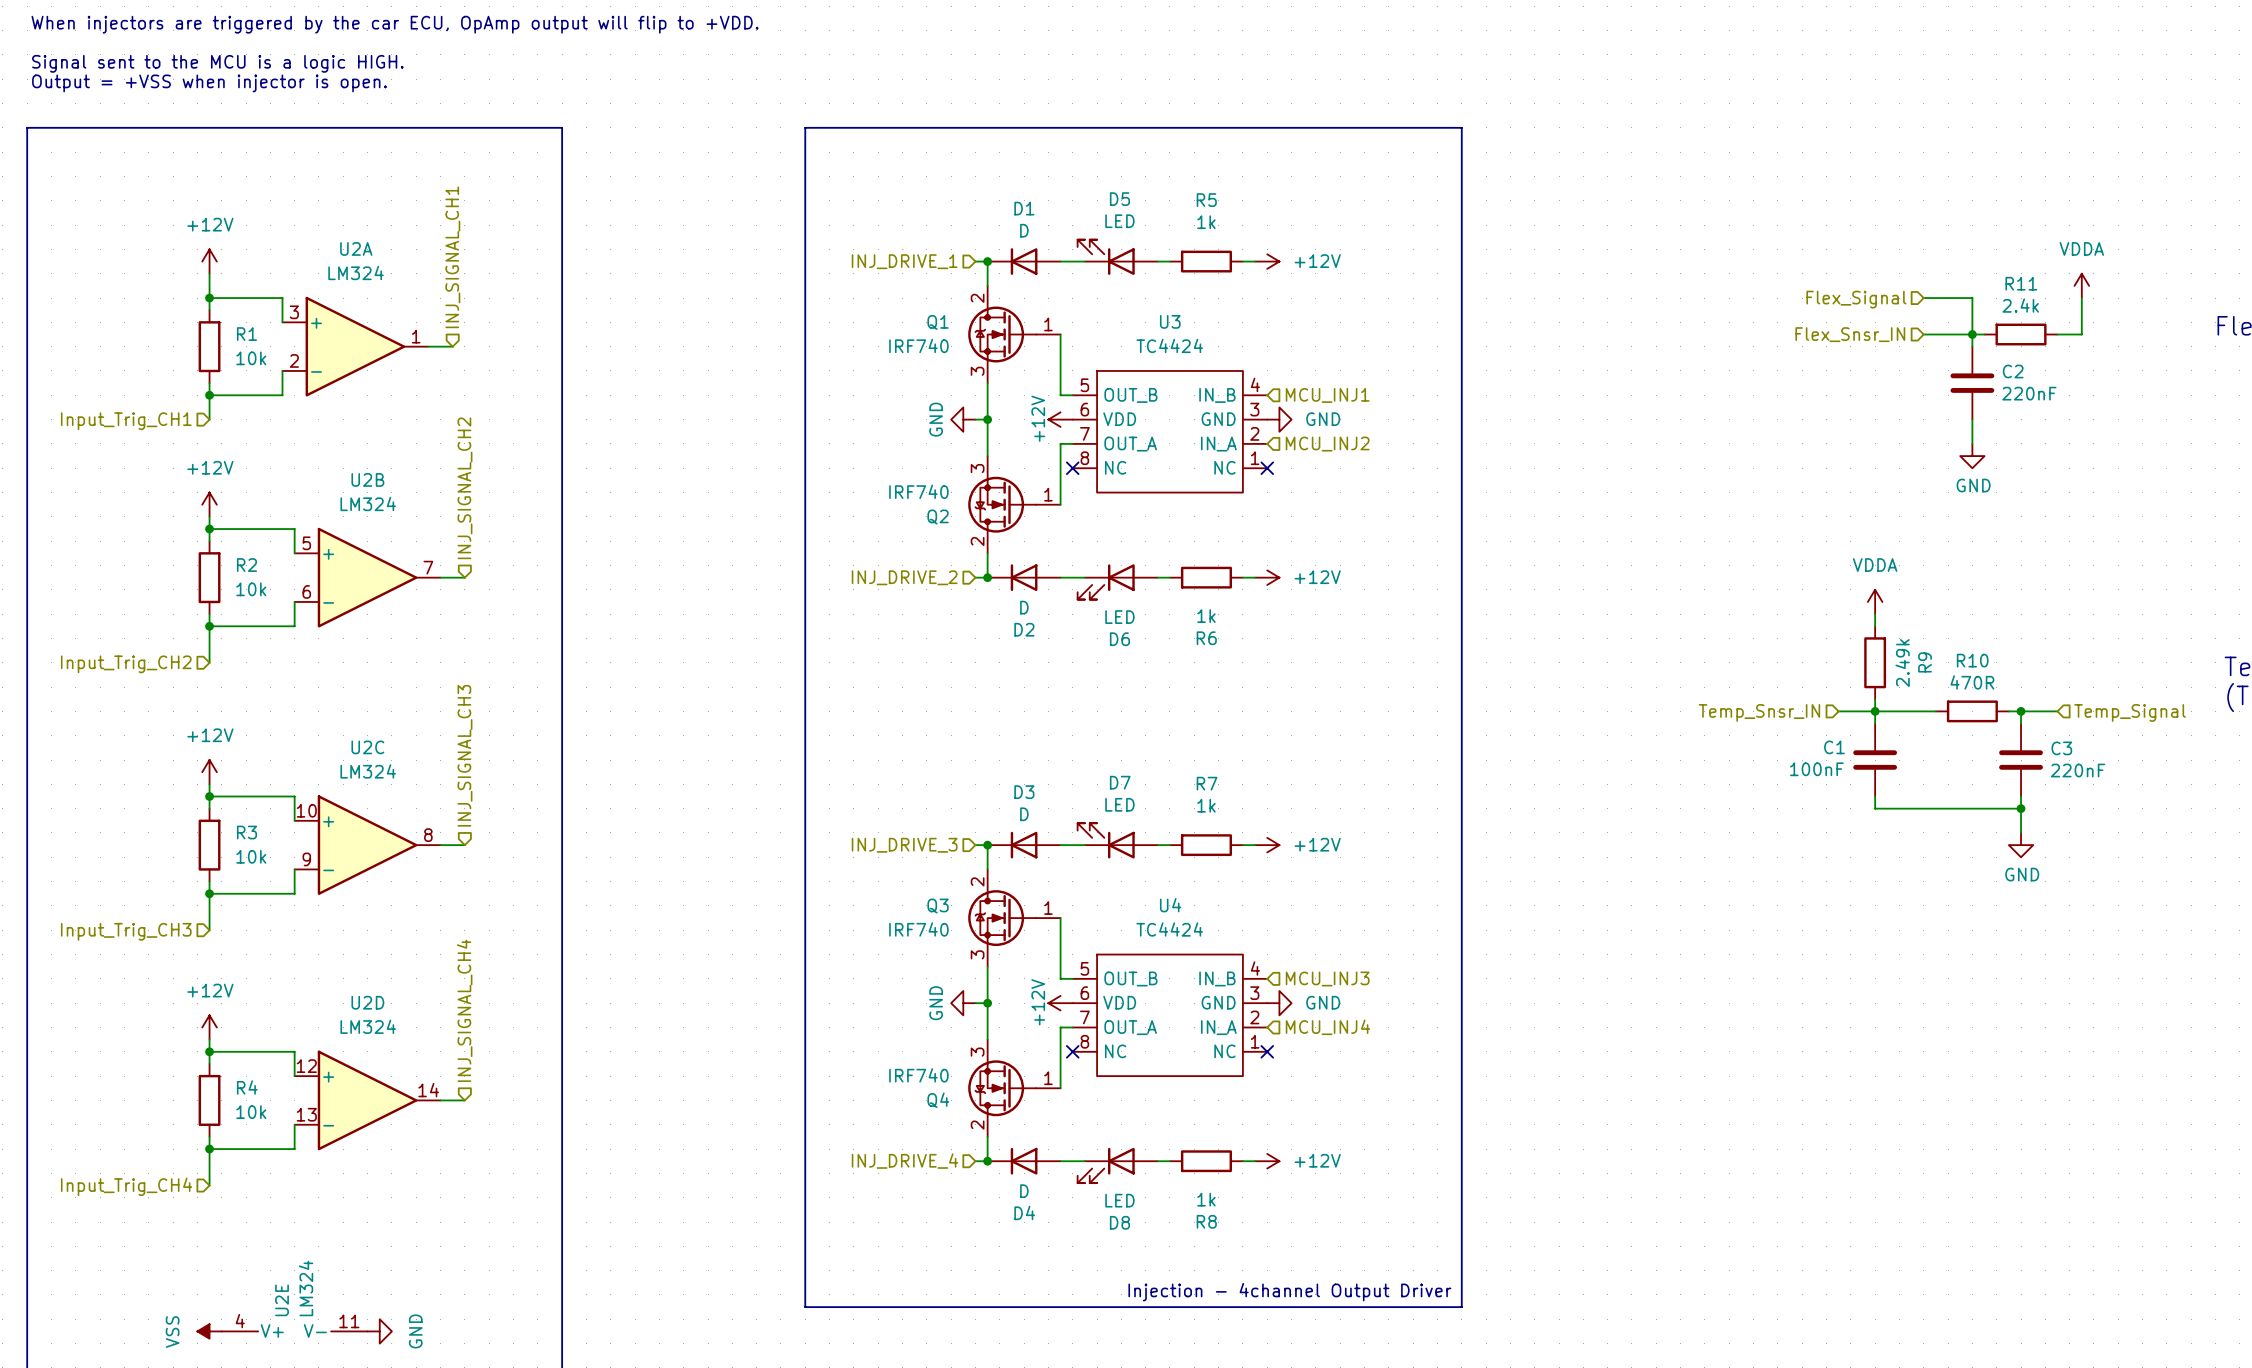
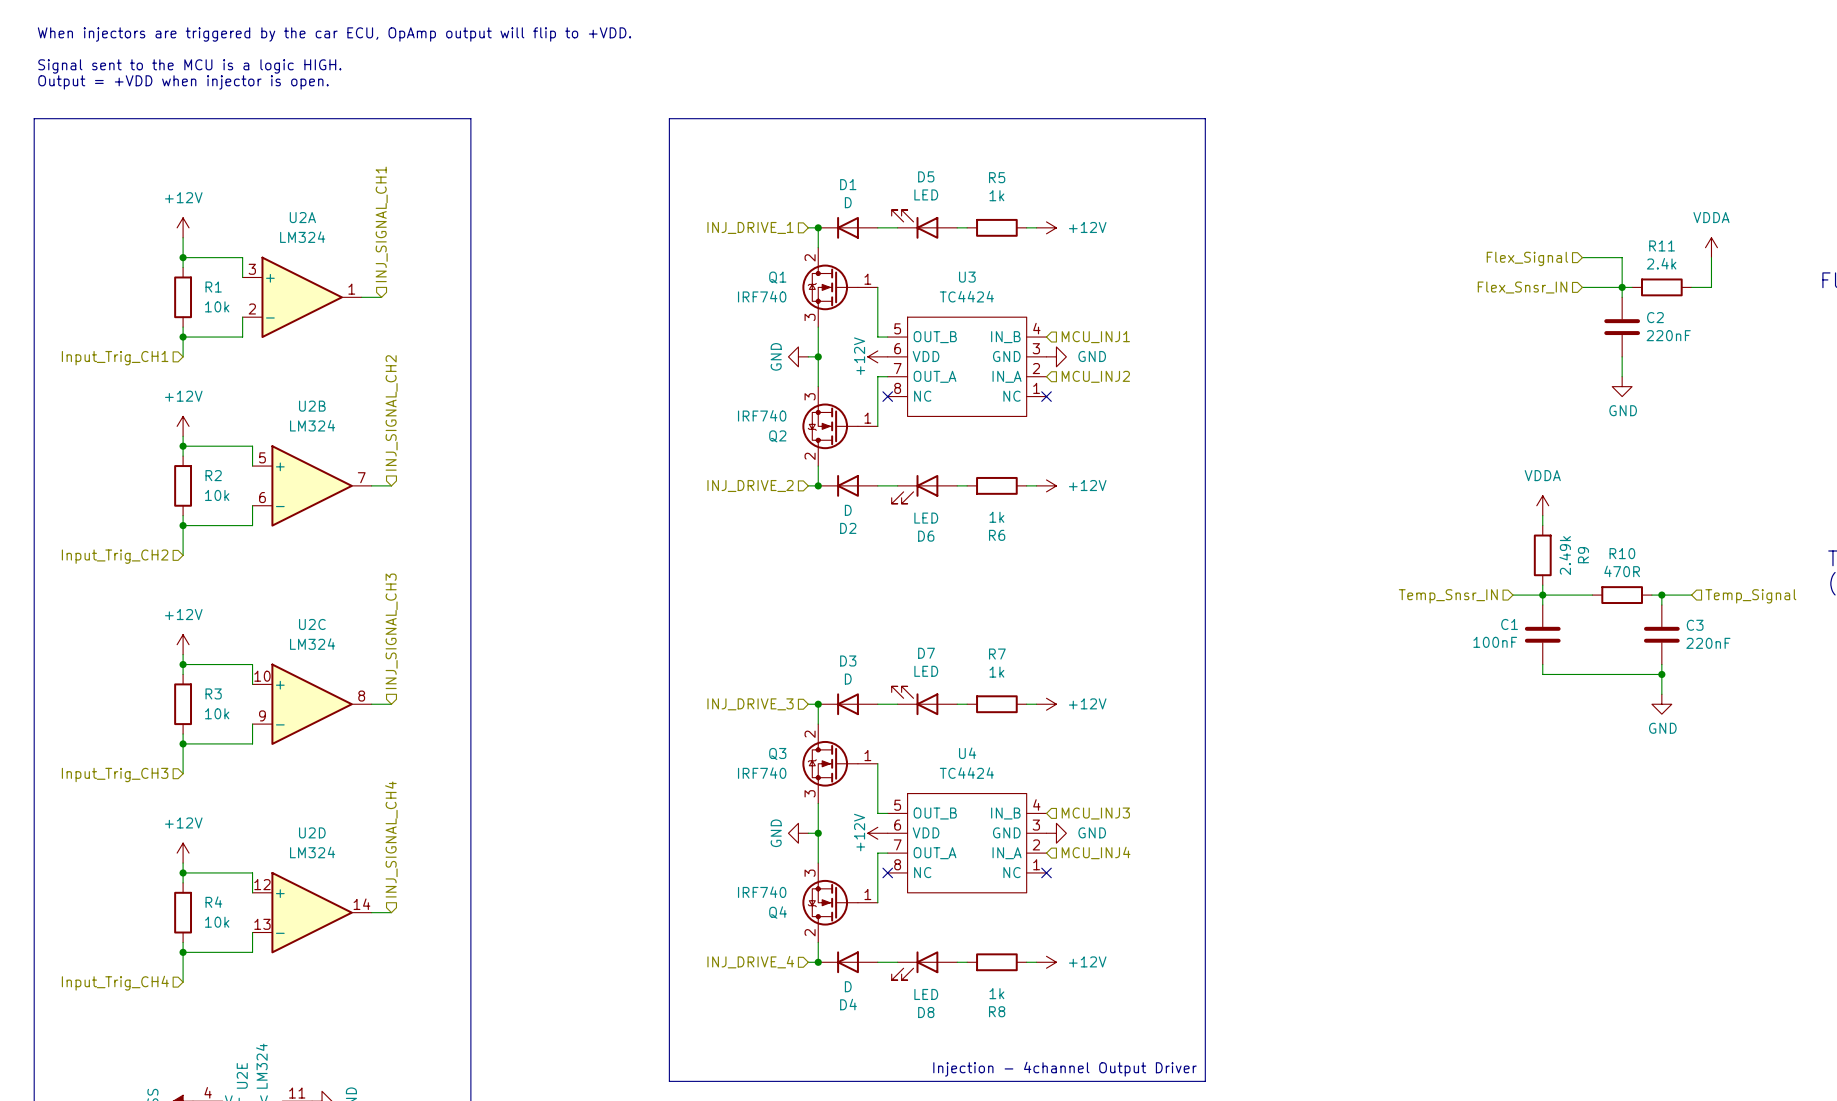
text: Output = +VSS when injector is open. (209, 83) -> Output = +VDD when injector is open. (183, 82)

